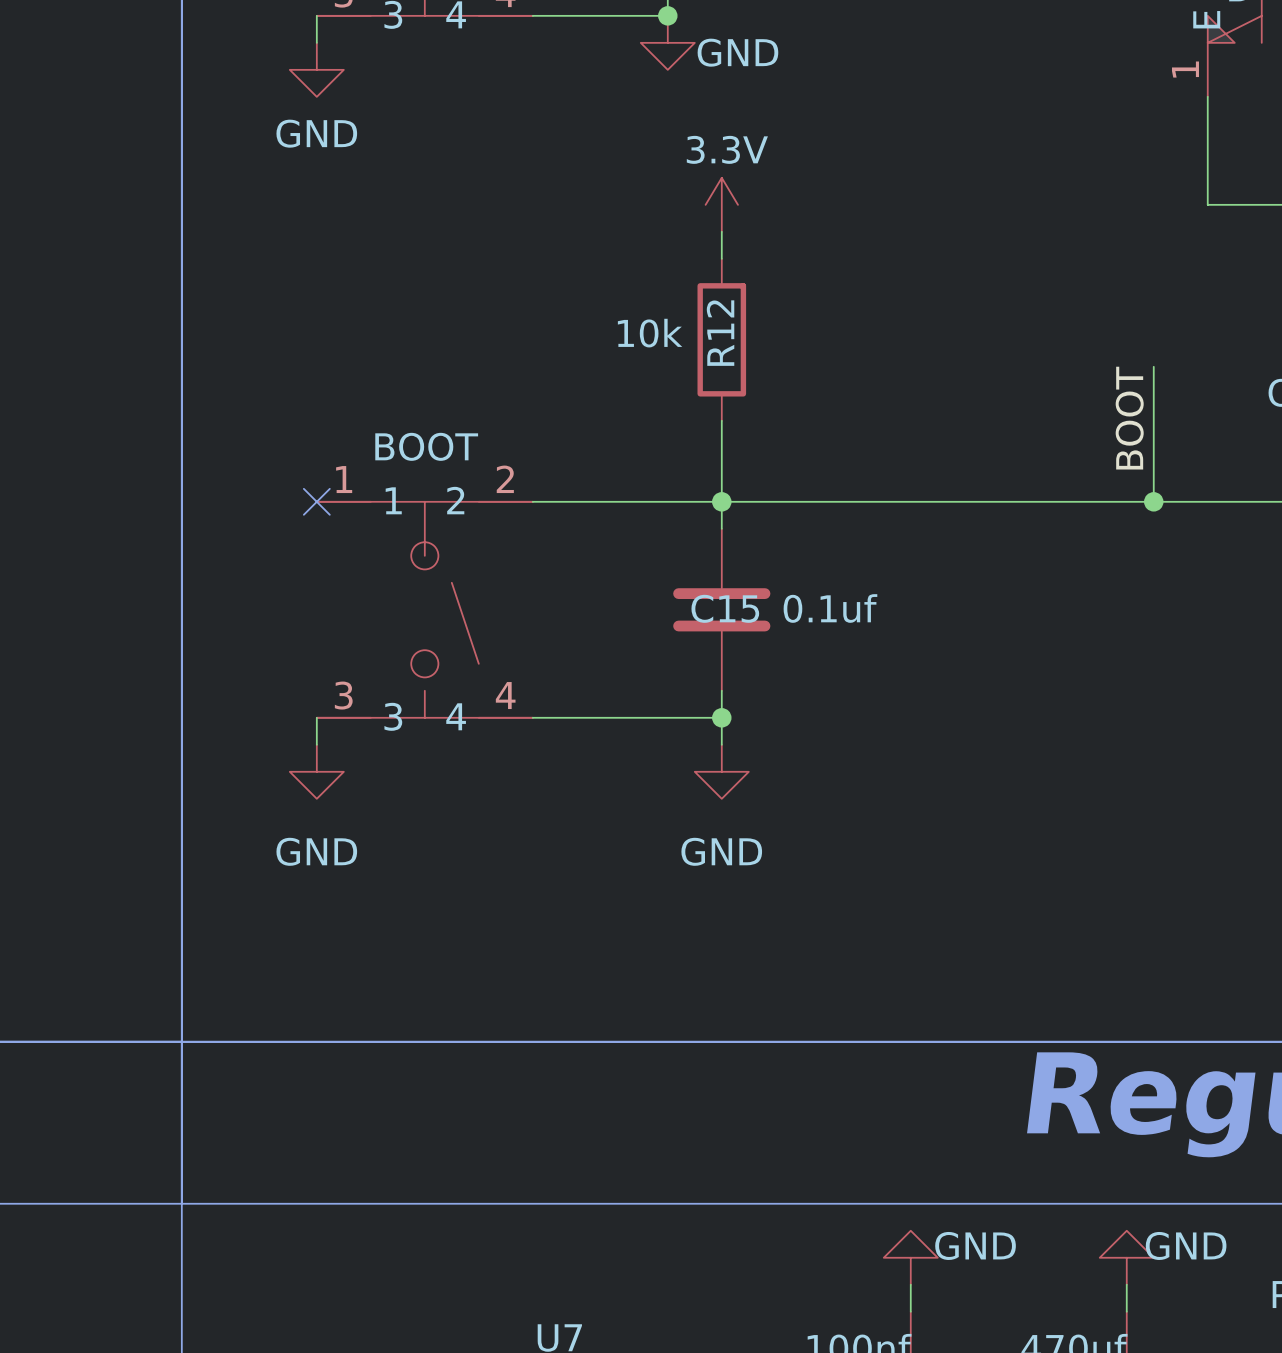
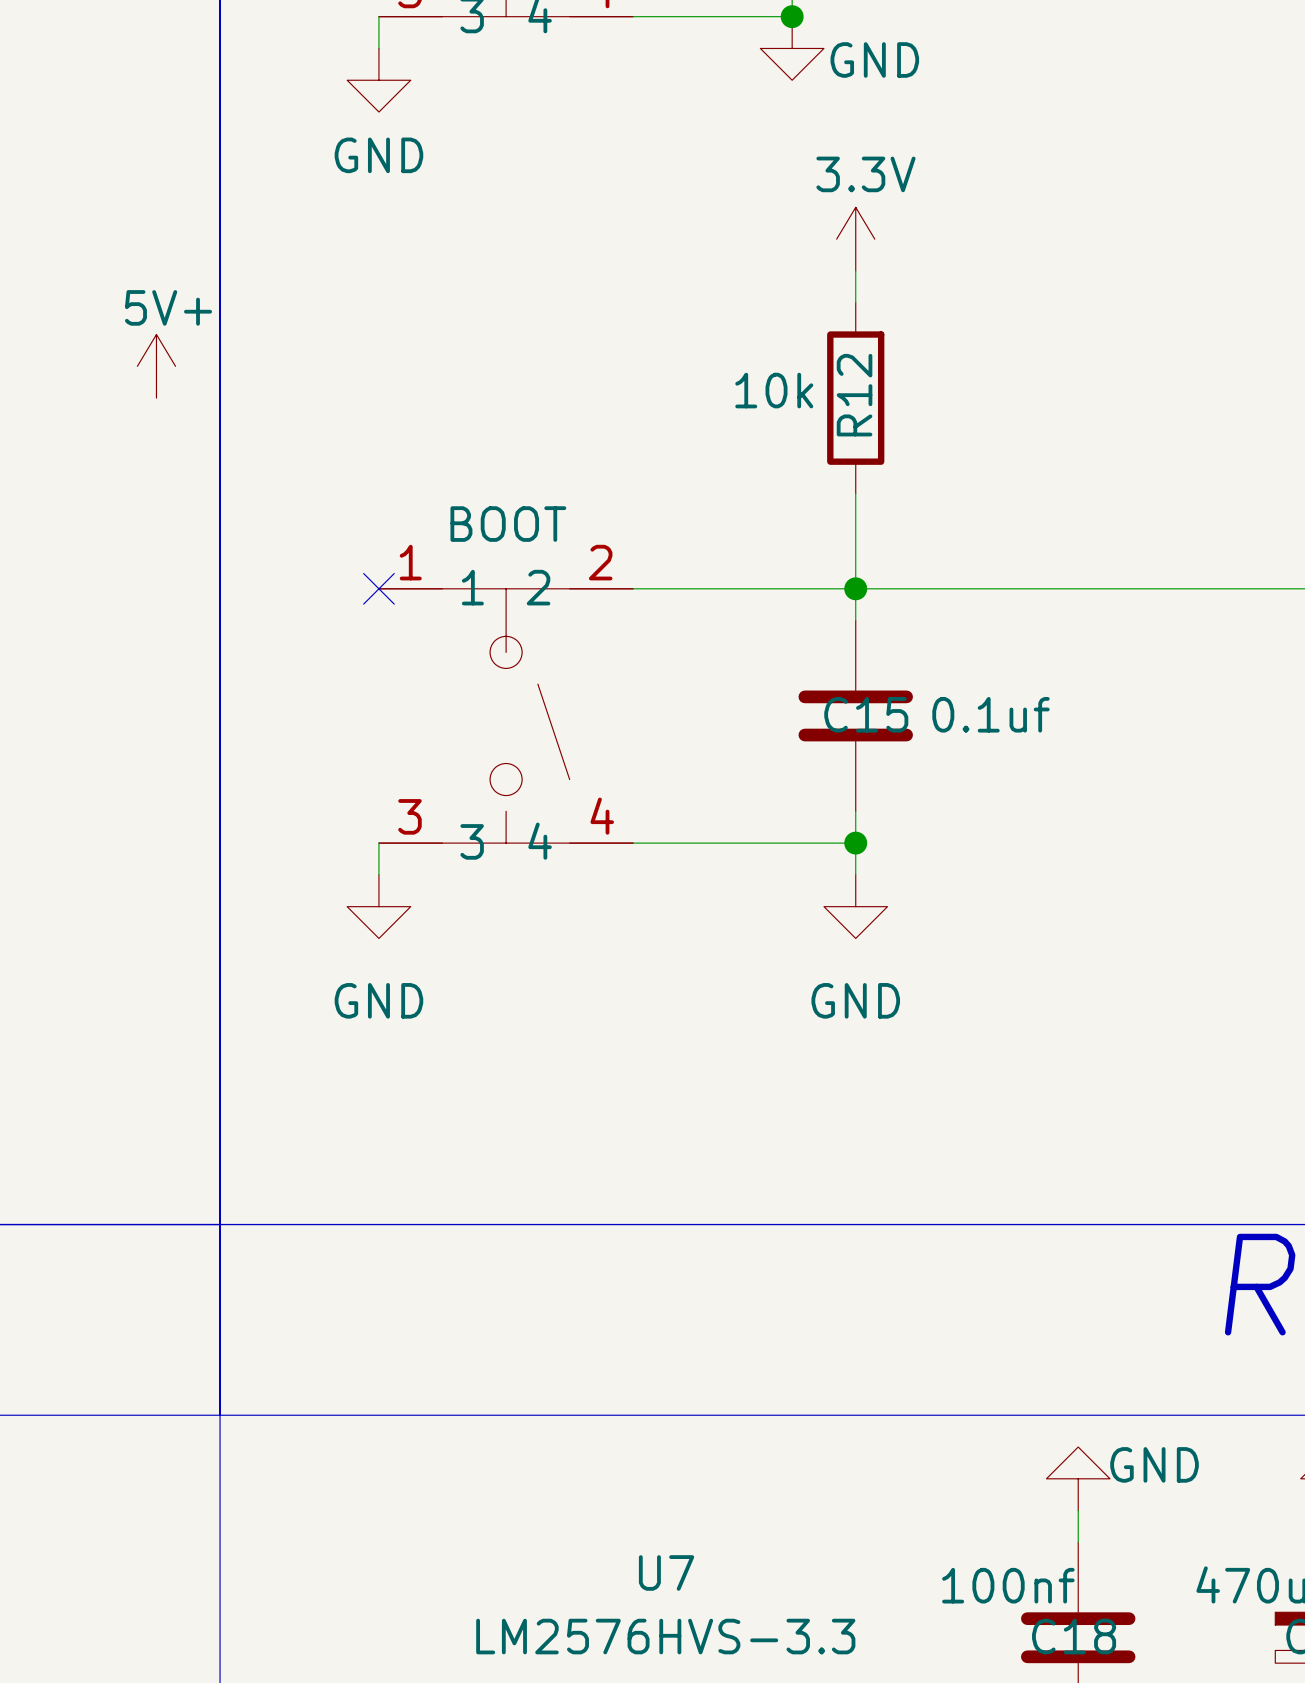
power symbol: none -> 5V+ (156, 366)

